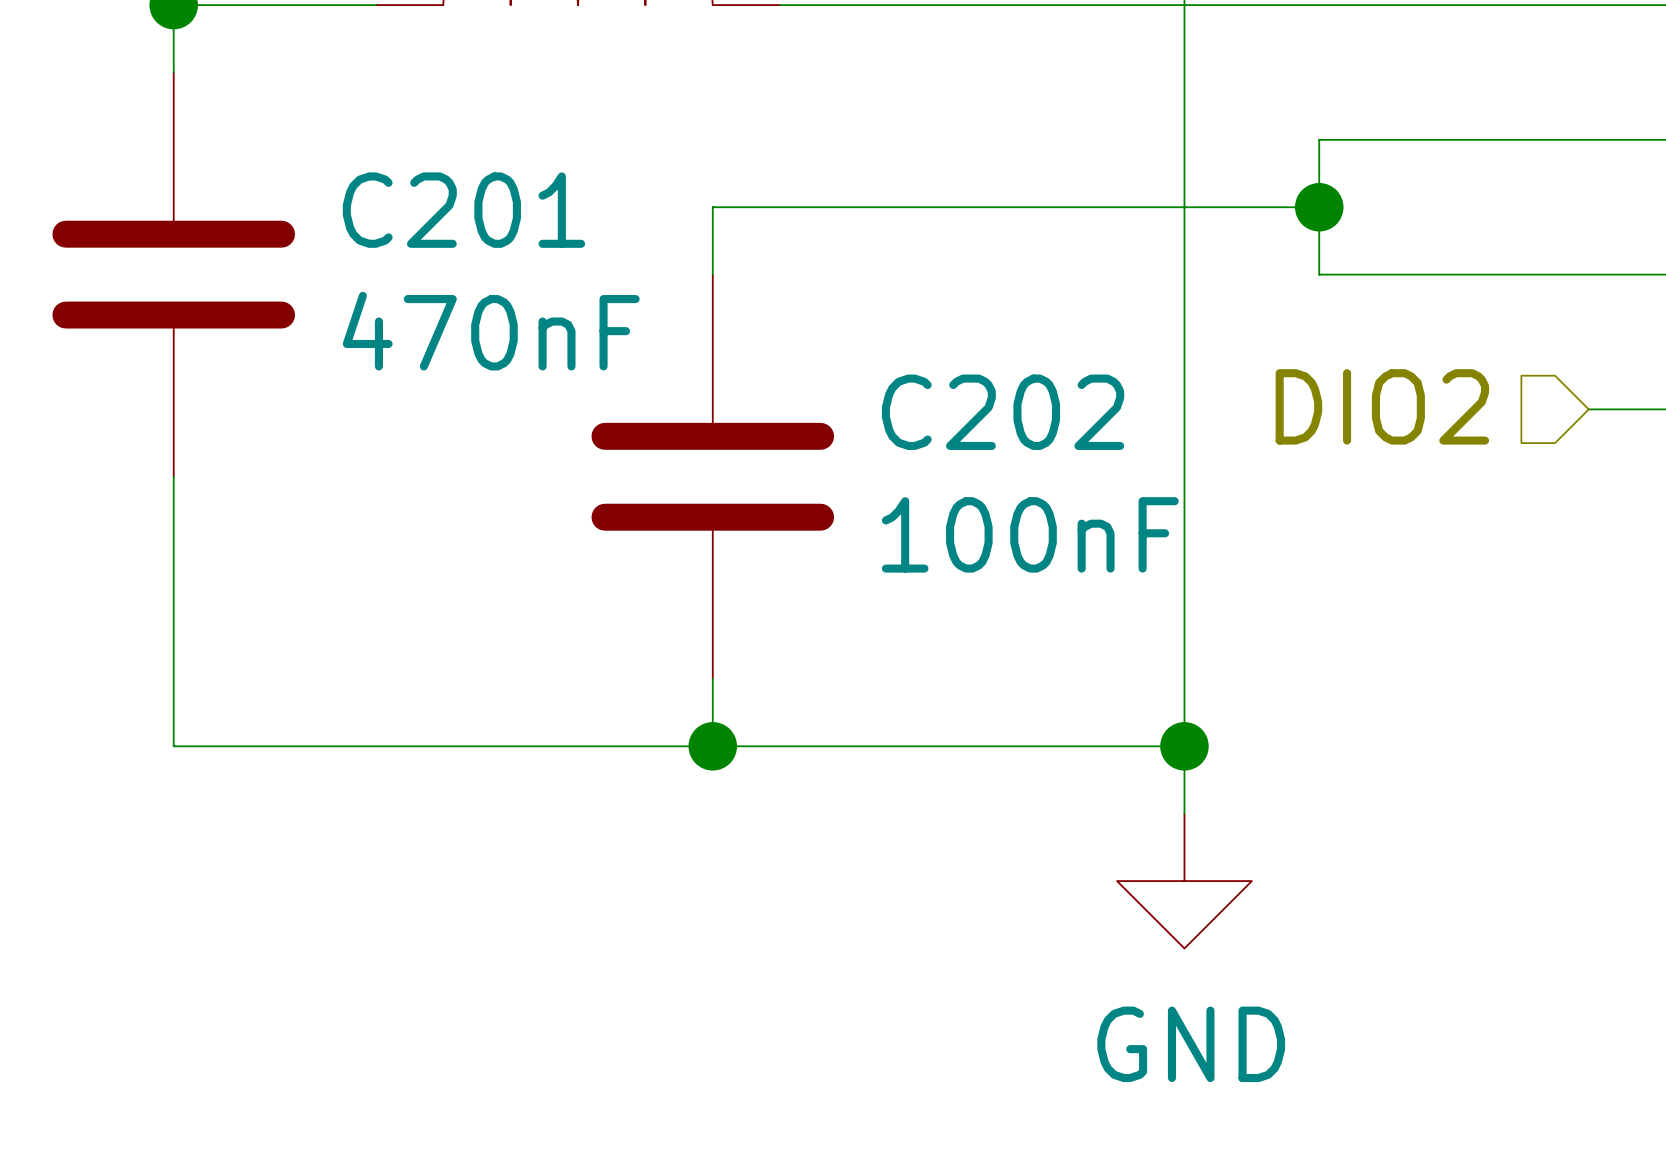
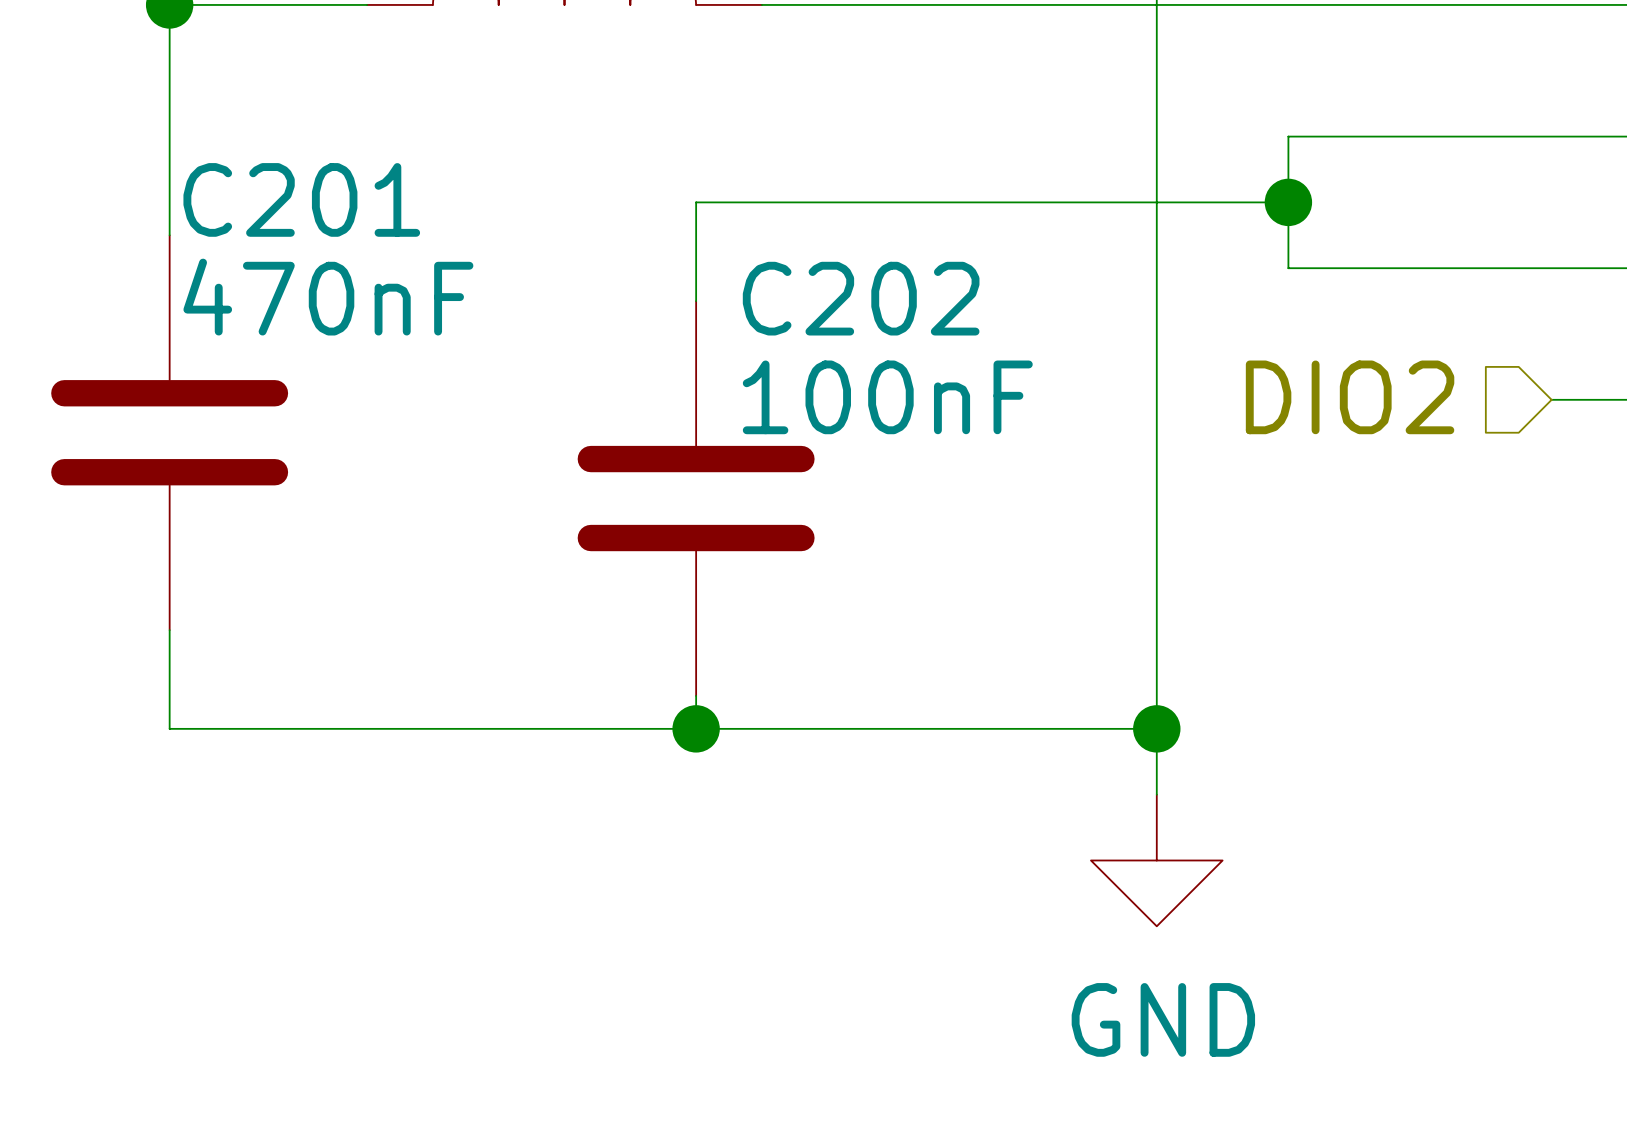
C201 name position: C201 (463, 210) -> C201 (301, 199)
C201 position: (173, 274) -> (169, 432)
C201 value position: 470nF (491, 331) -> 470nF (328, 297)
C202 name position: C202 (1003, 412) -> C202 (861, 298)
C202 position: (712, 476) -> (696, 498)
C202 value position: 100nF (1030, 534) -> 100nF (887, 397)

